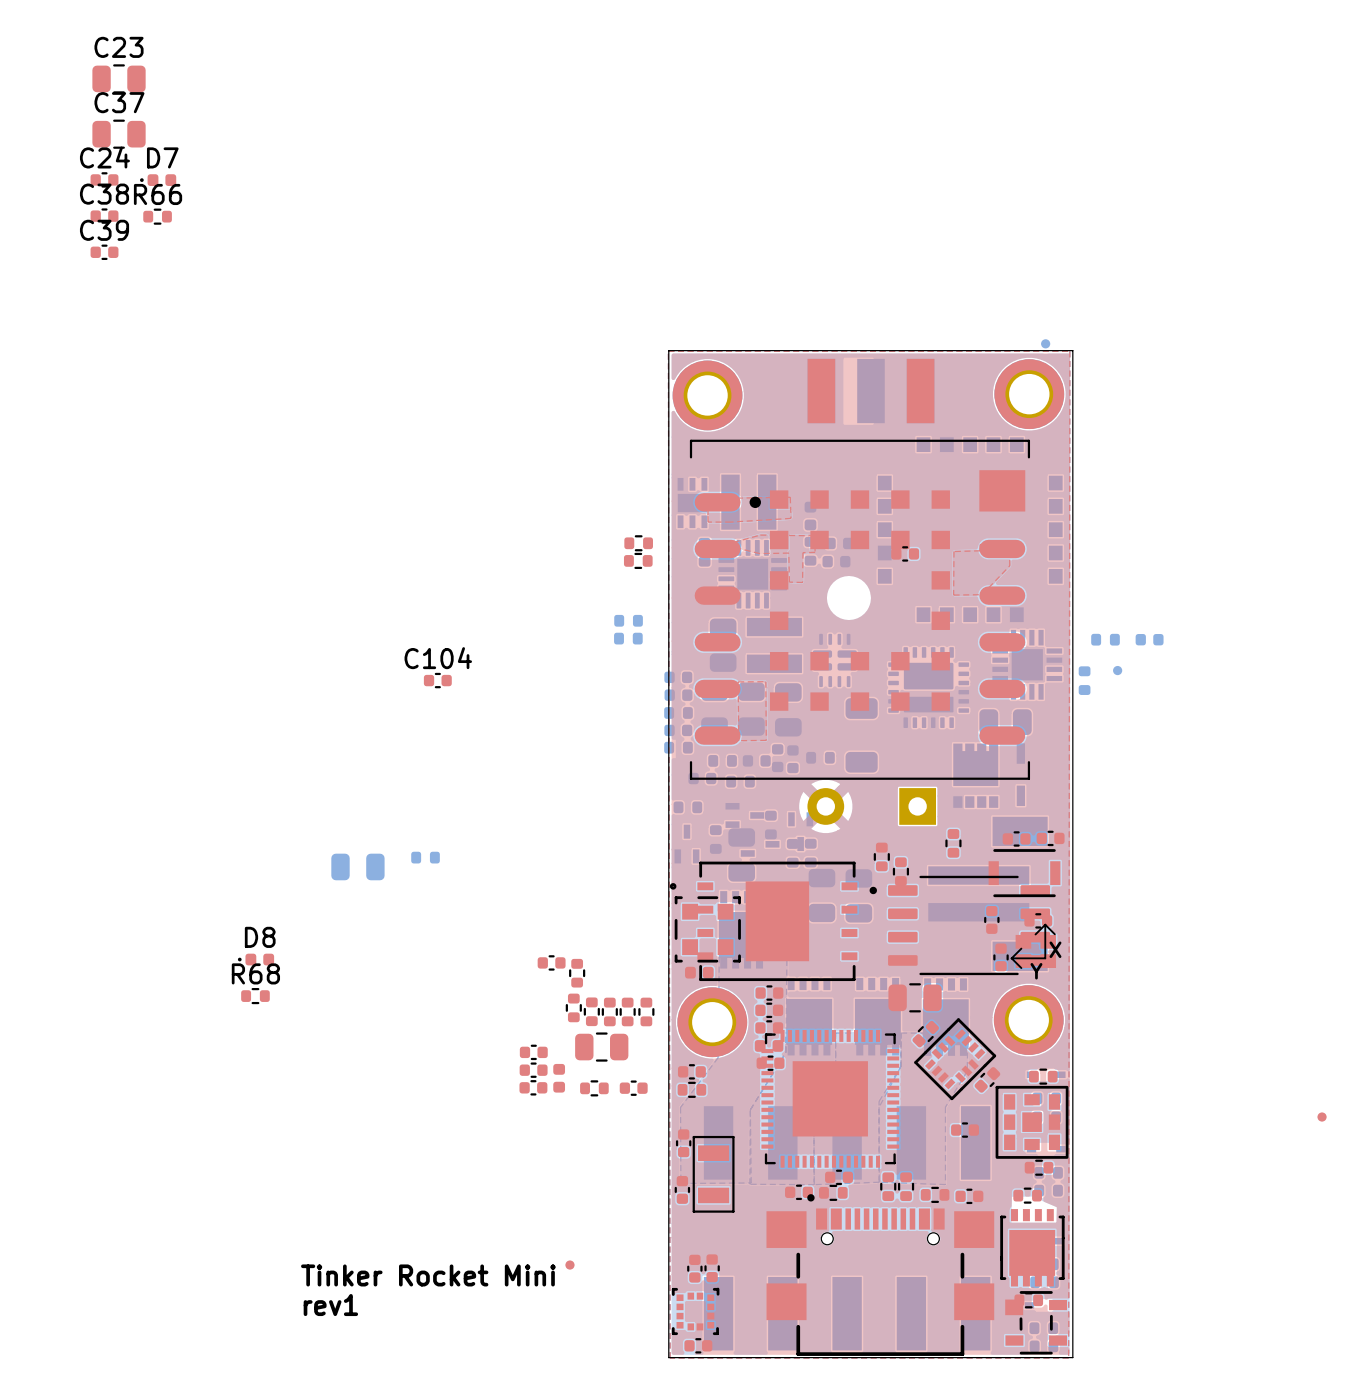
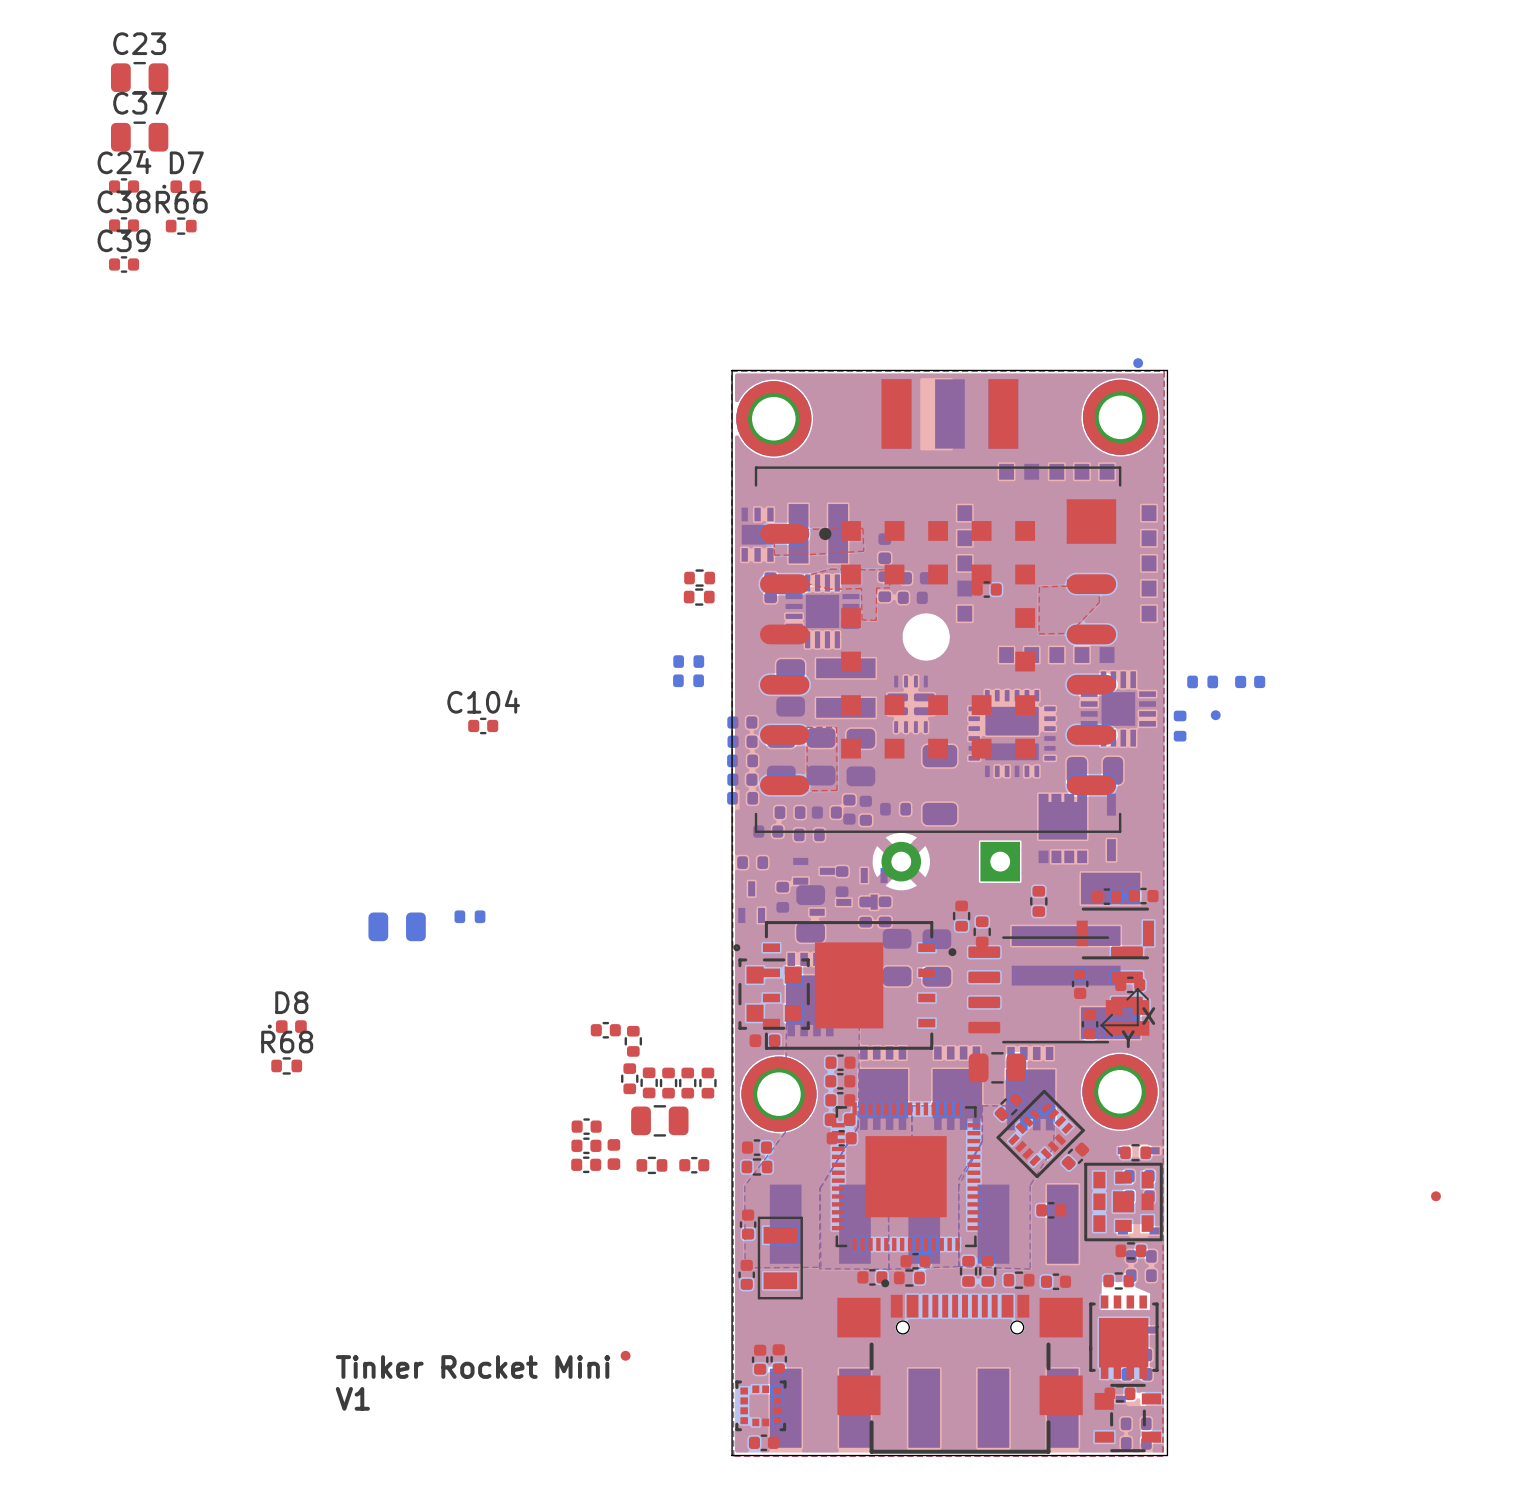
text: rev1 (330, 1305) -> V1 (352, 1398)

